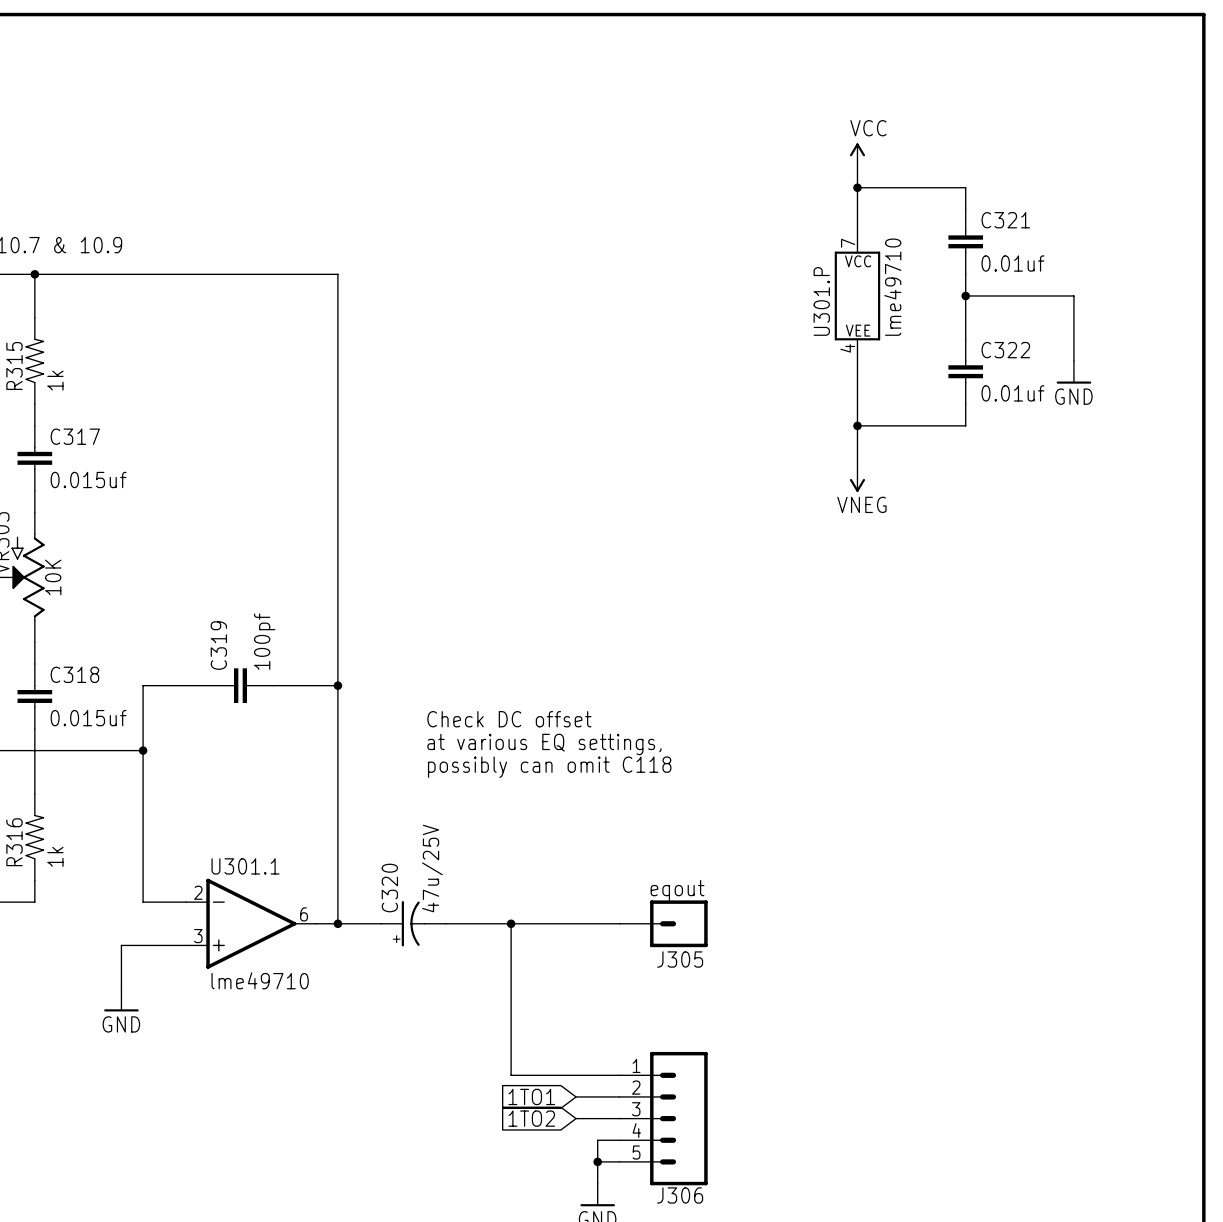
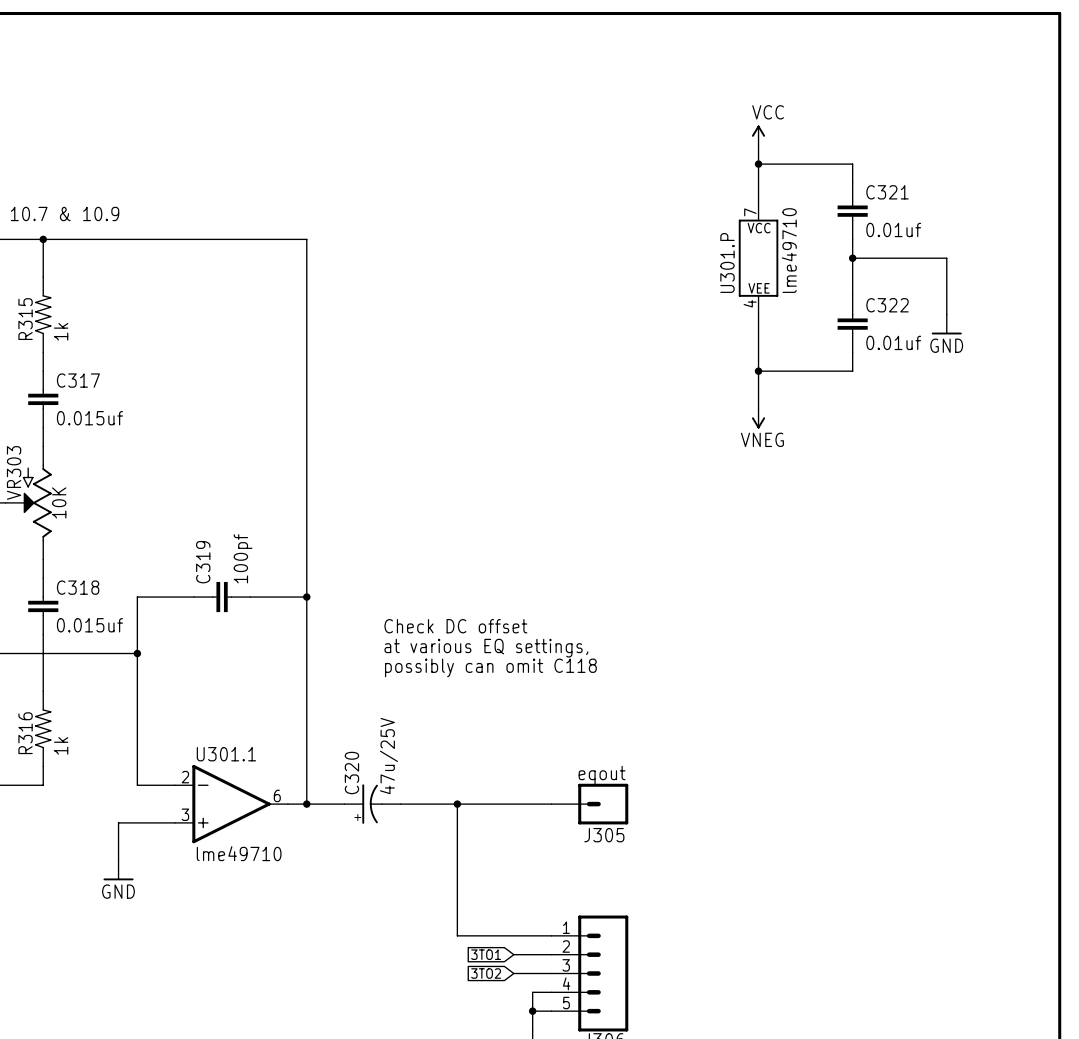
global label: 1TO1 (531, 1096) -> 3TO1 (486, 954)
global label: 1TO2 (531, 1118) -> 3TO2 (486, 973)

